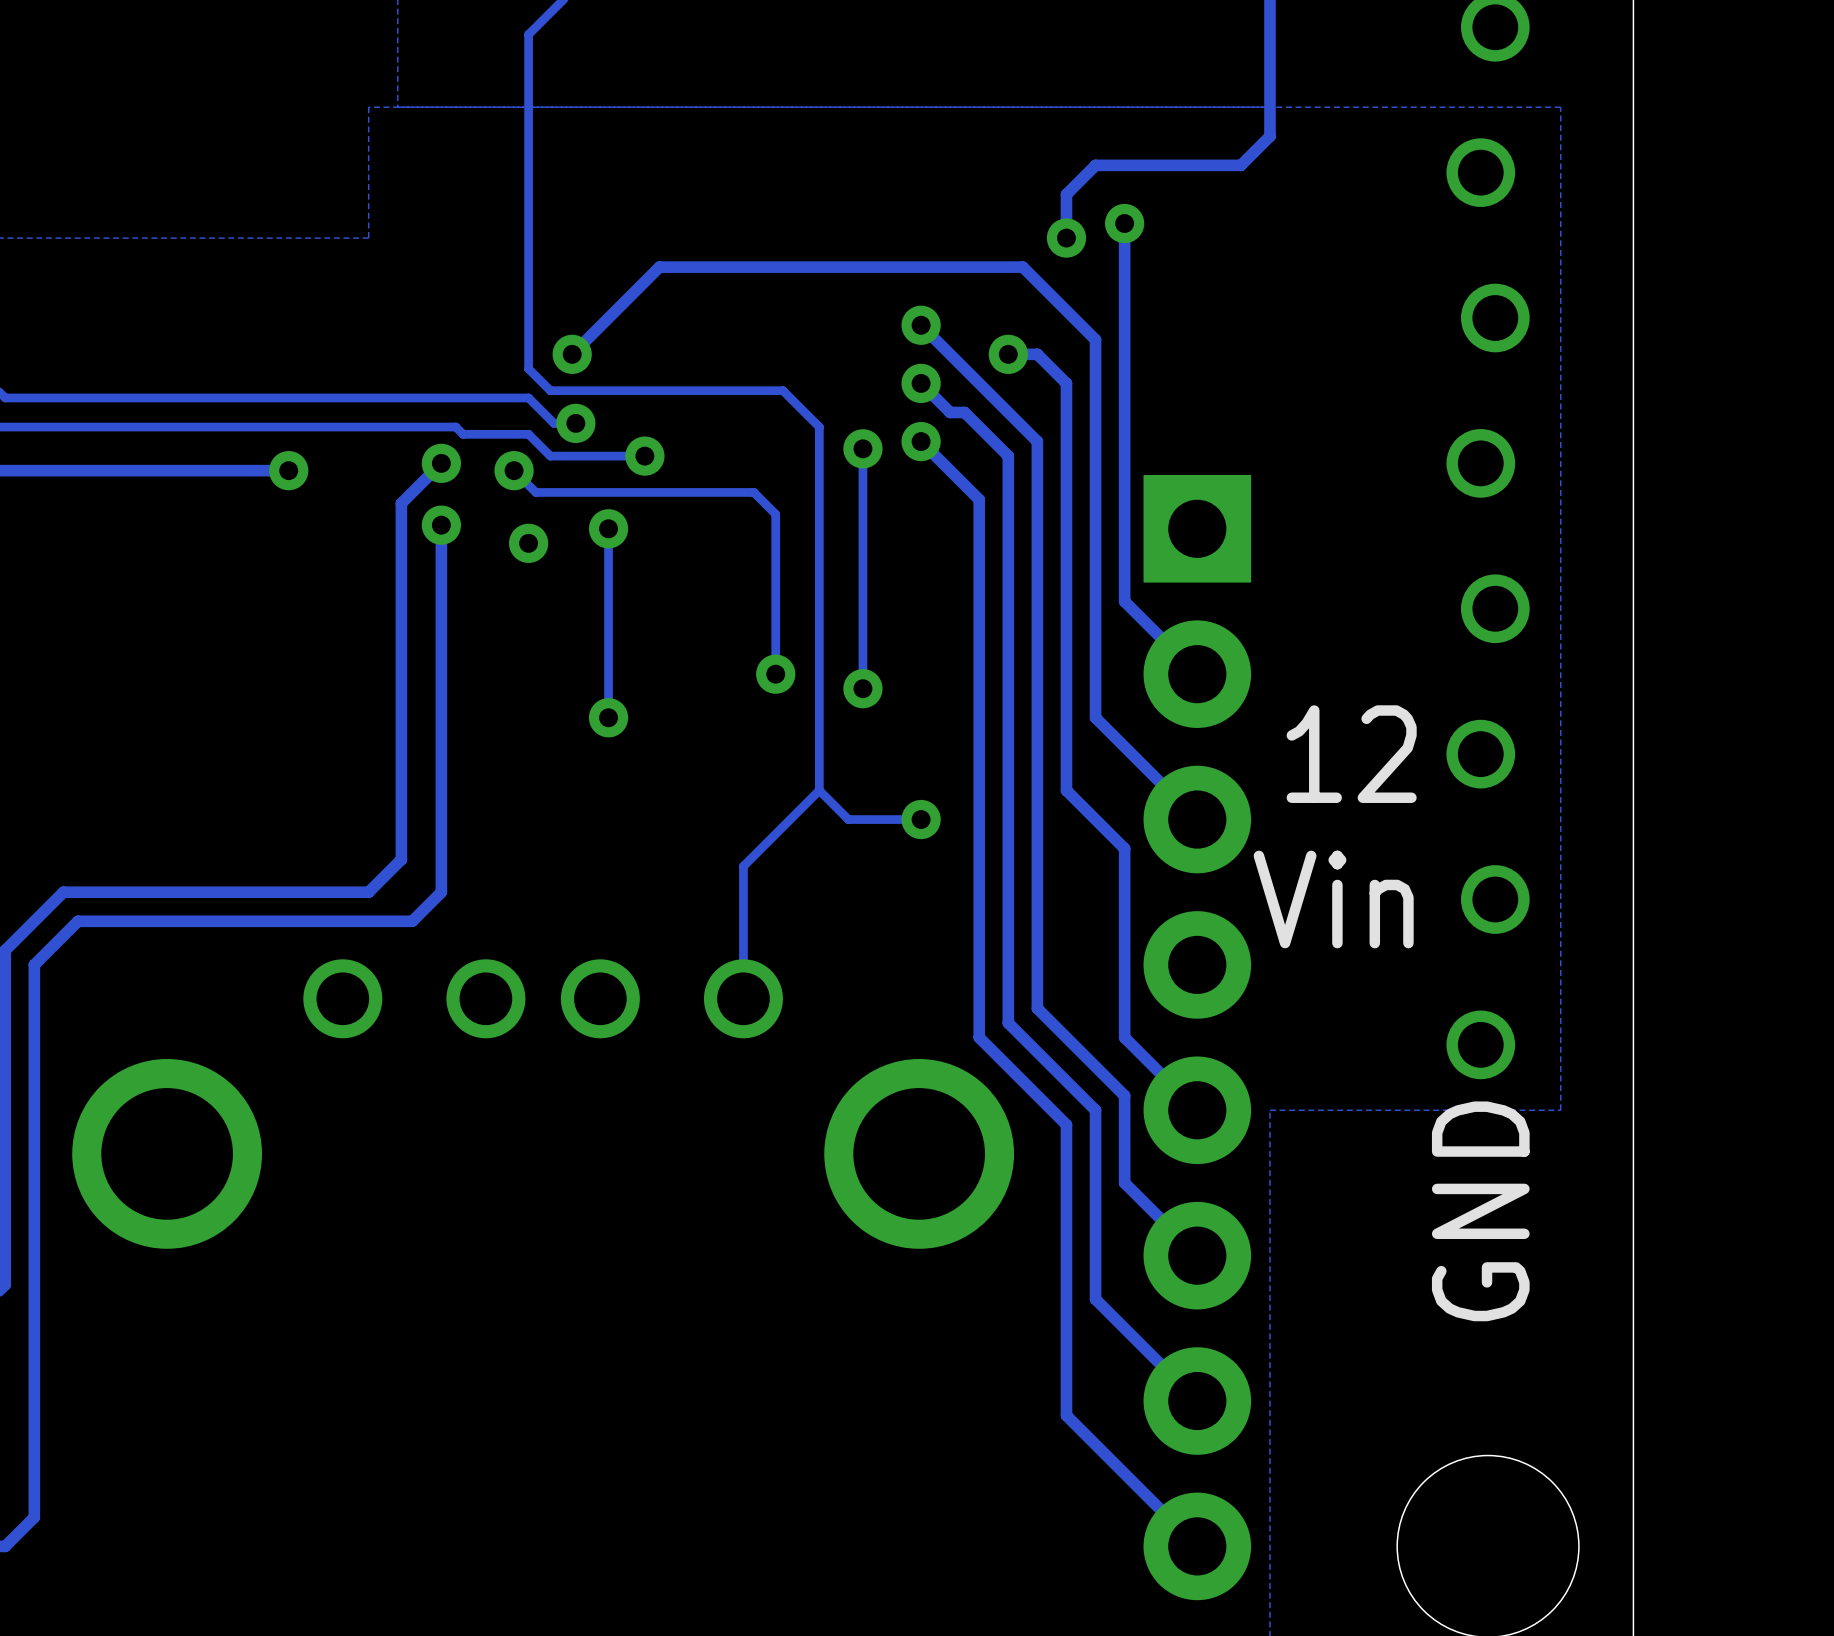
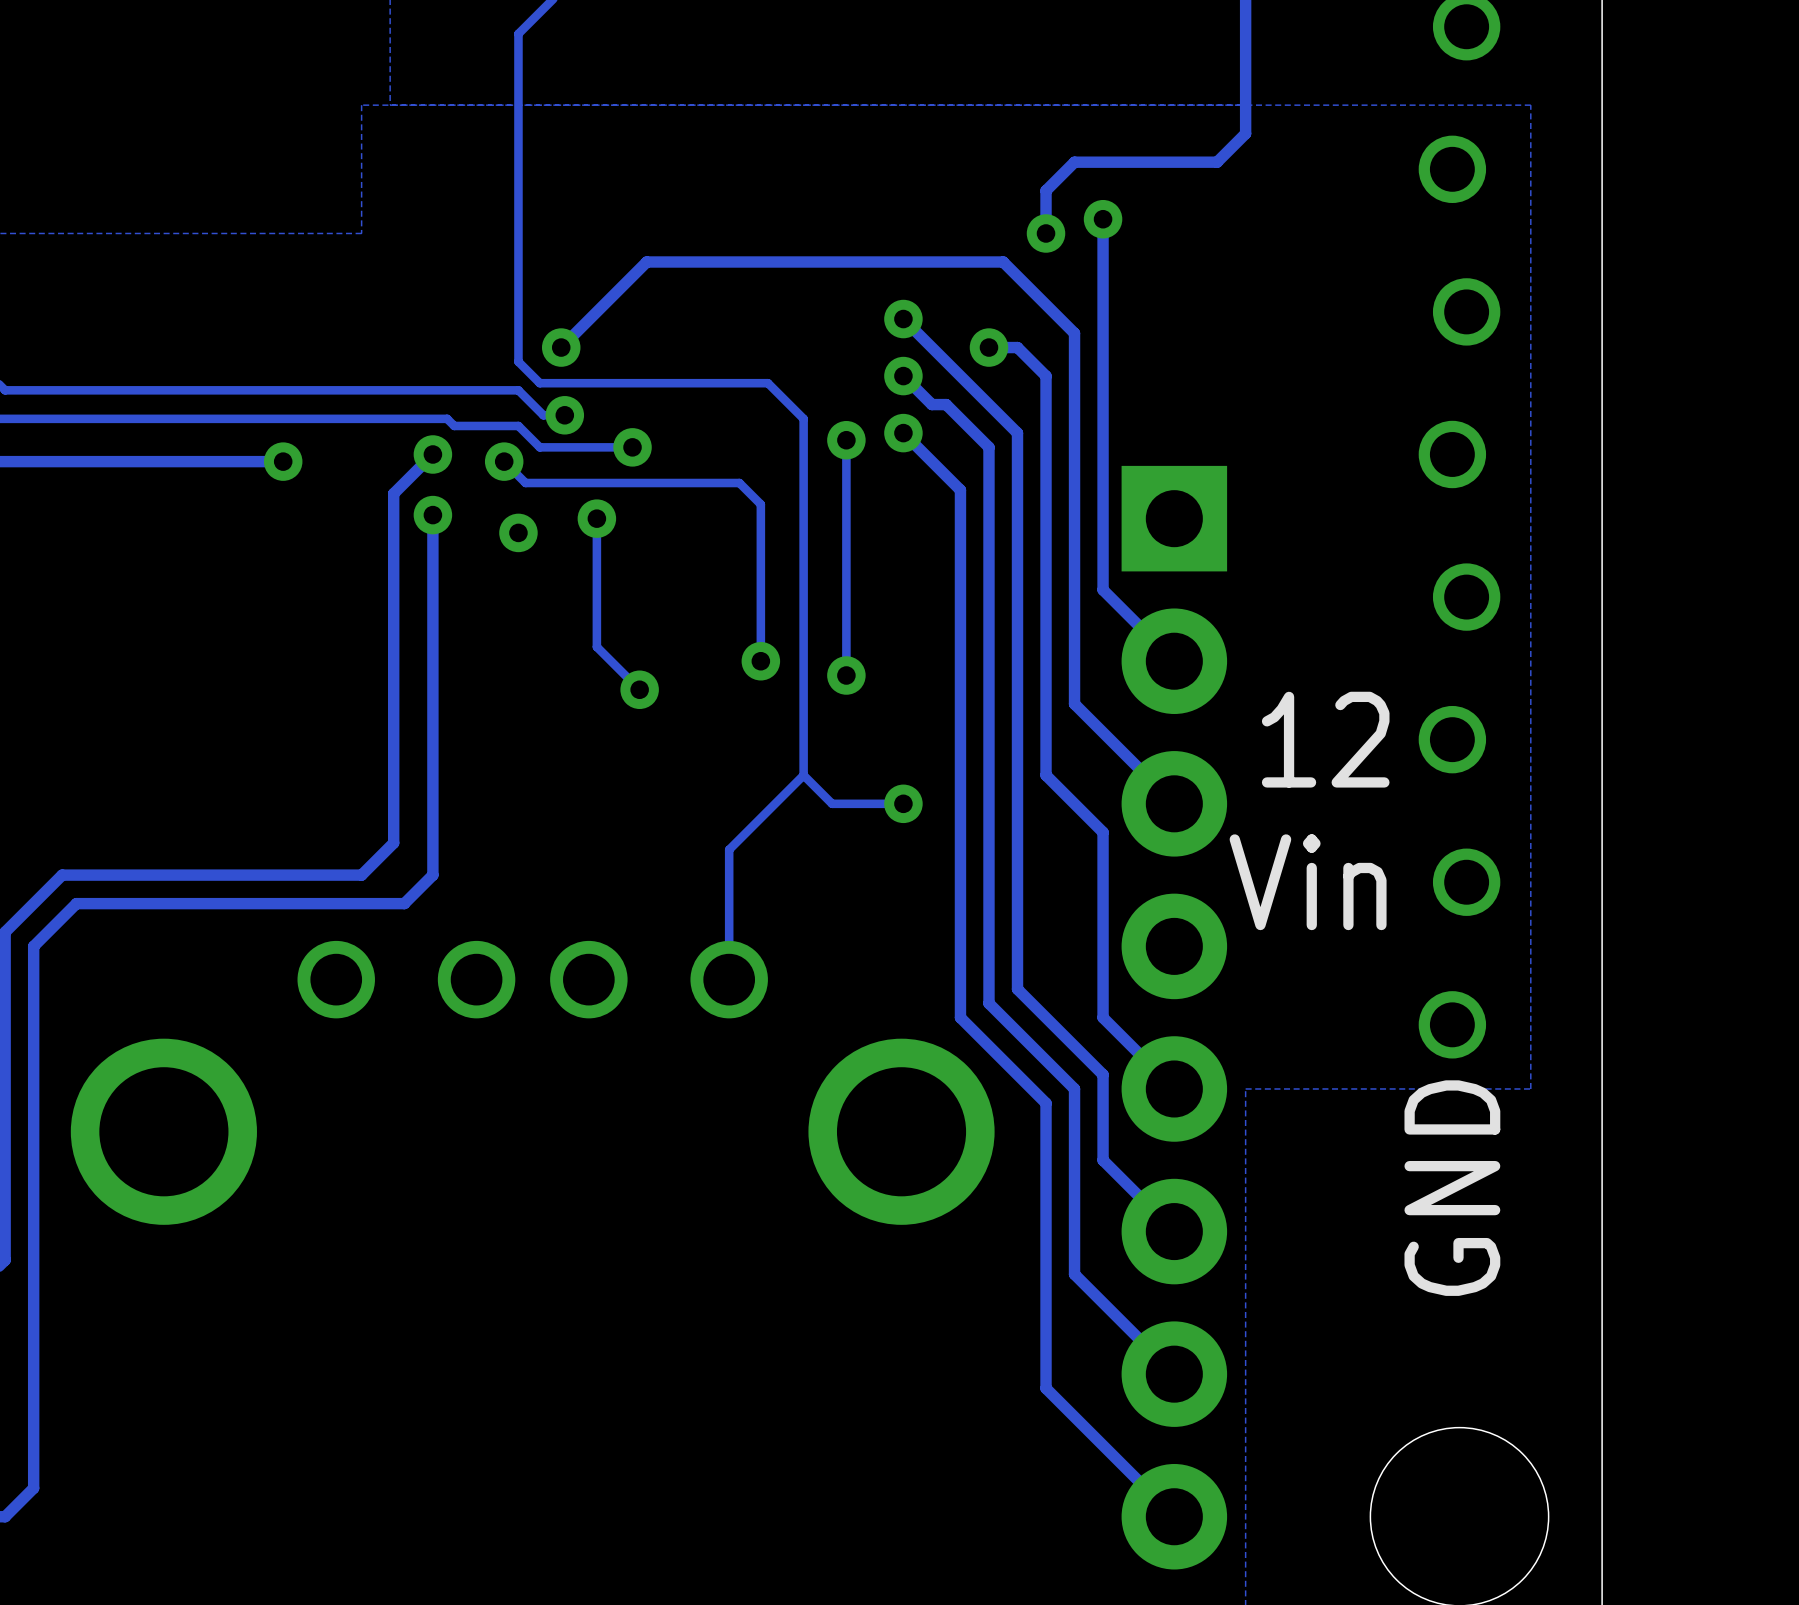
track: (608, 659) (608, 717) -> (596, 646) (639, 689)
via position: (608, 717) -> (639, 689)

